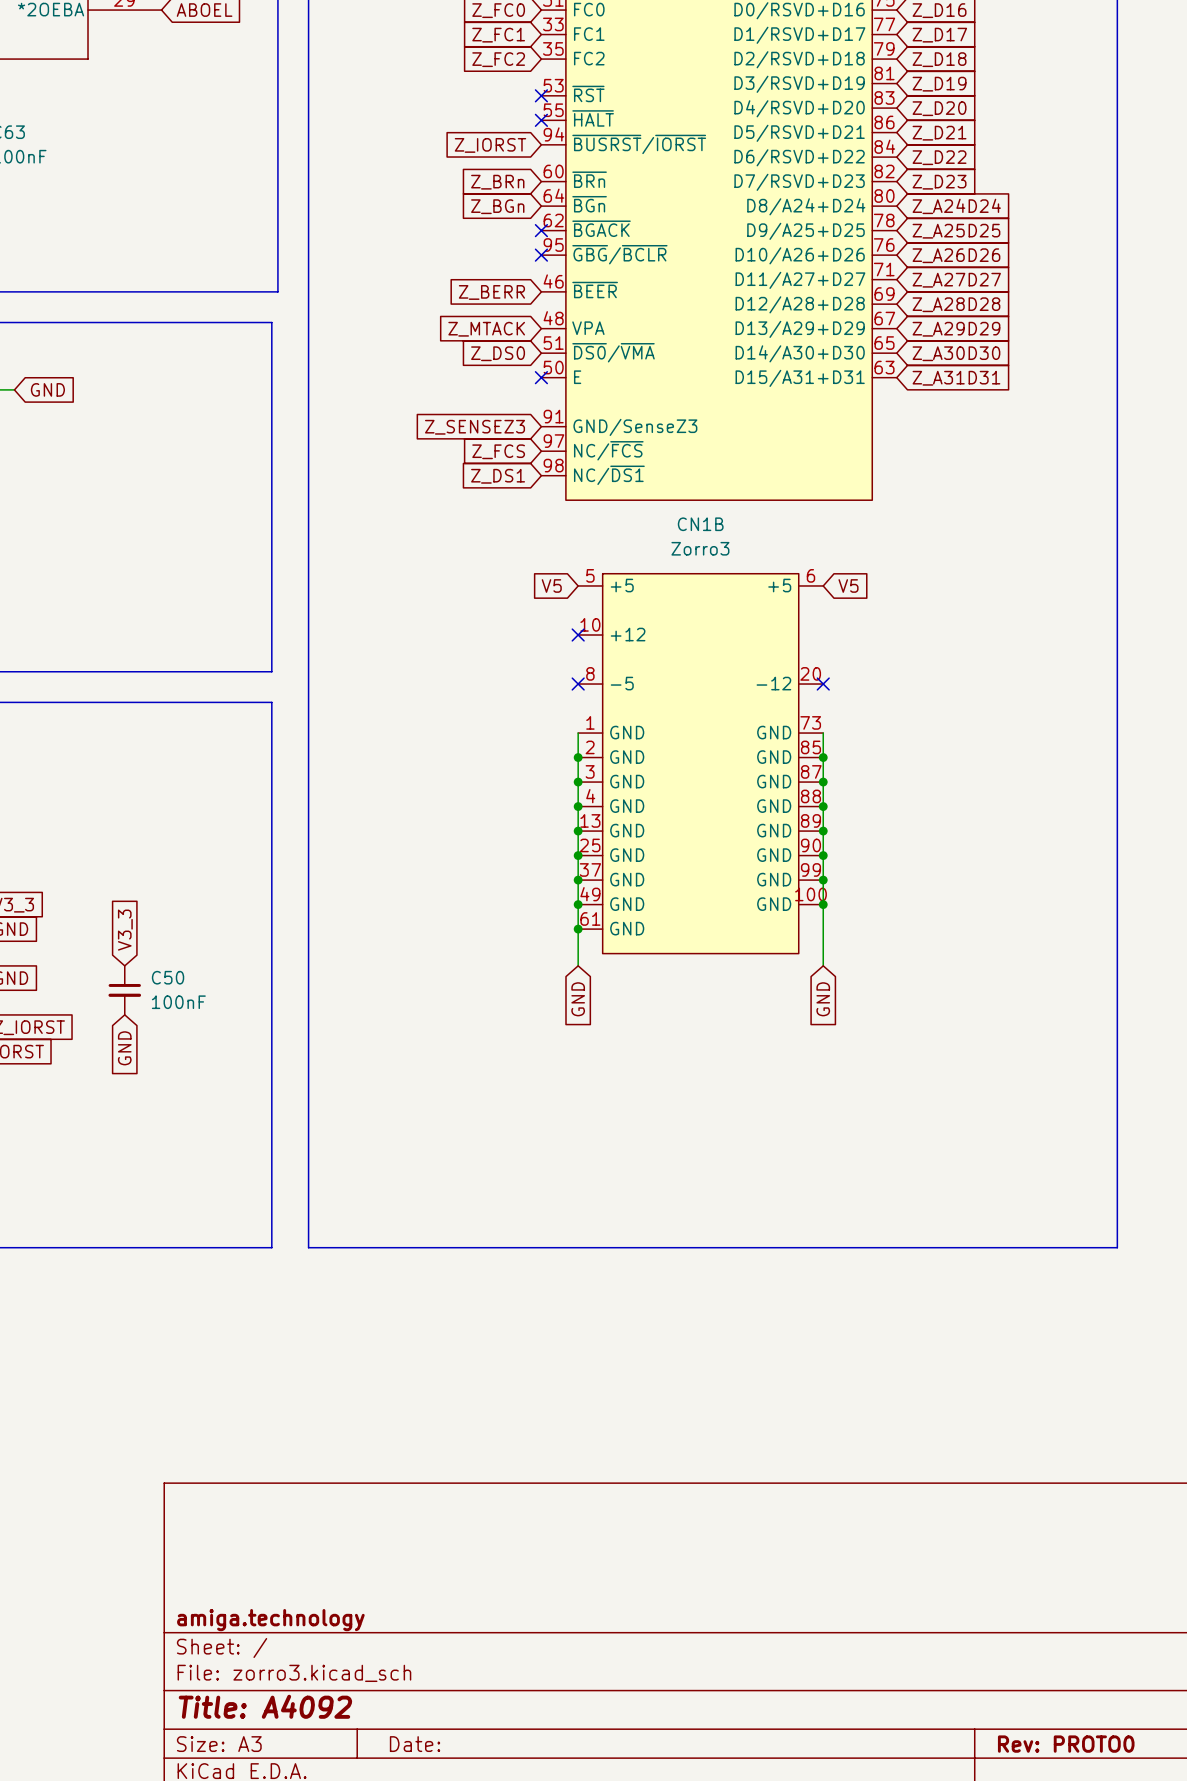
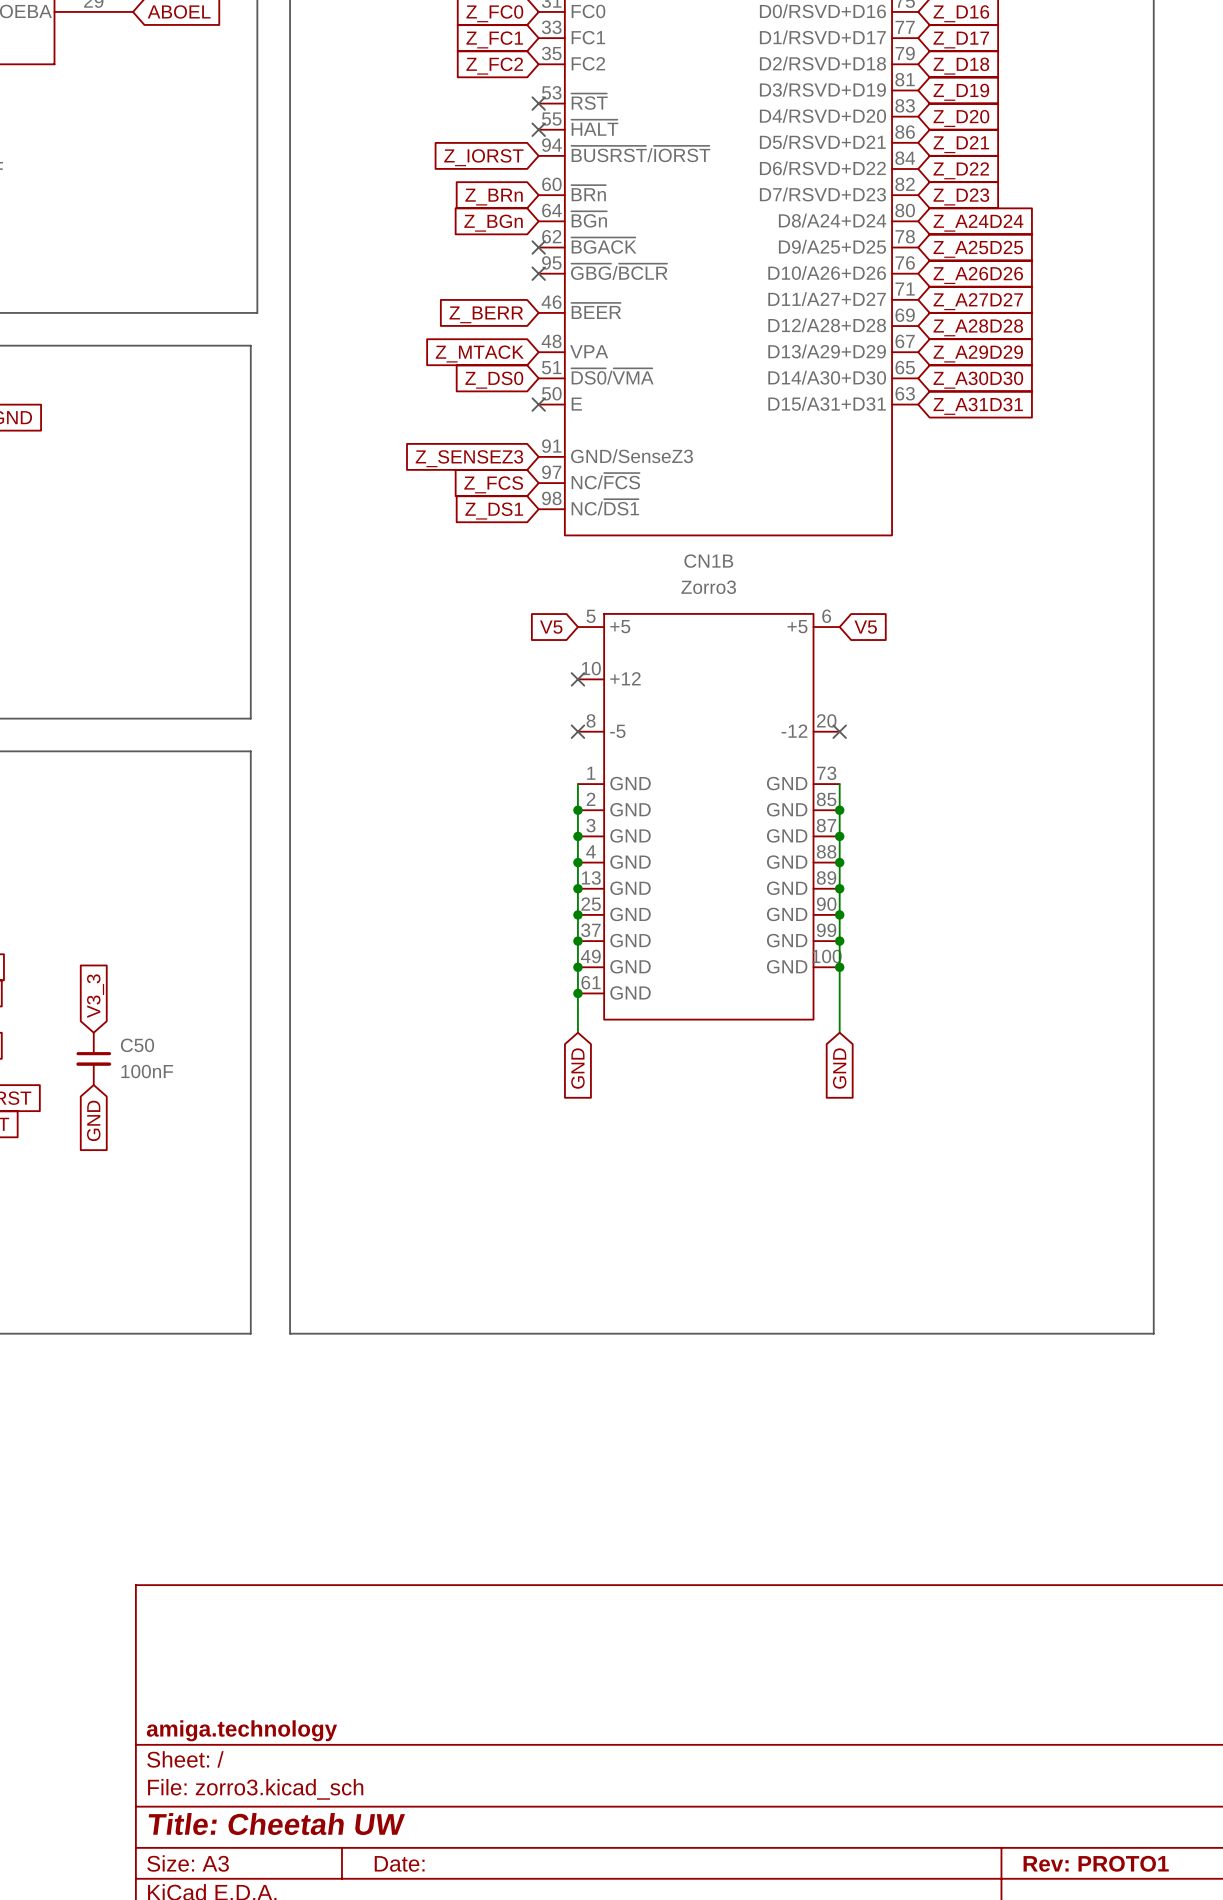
title block: Title: A4092 (265, 1706) -> Title: Cheetah UW (276, 1824)
title block: Rev: PROTO0 (1066, 1744) -> Rev: PROTO1 (1096, 1863)

